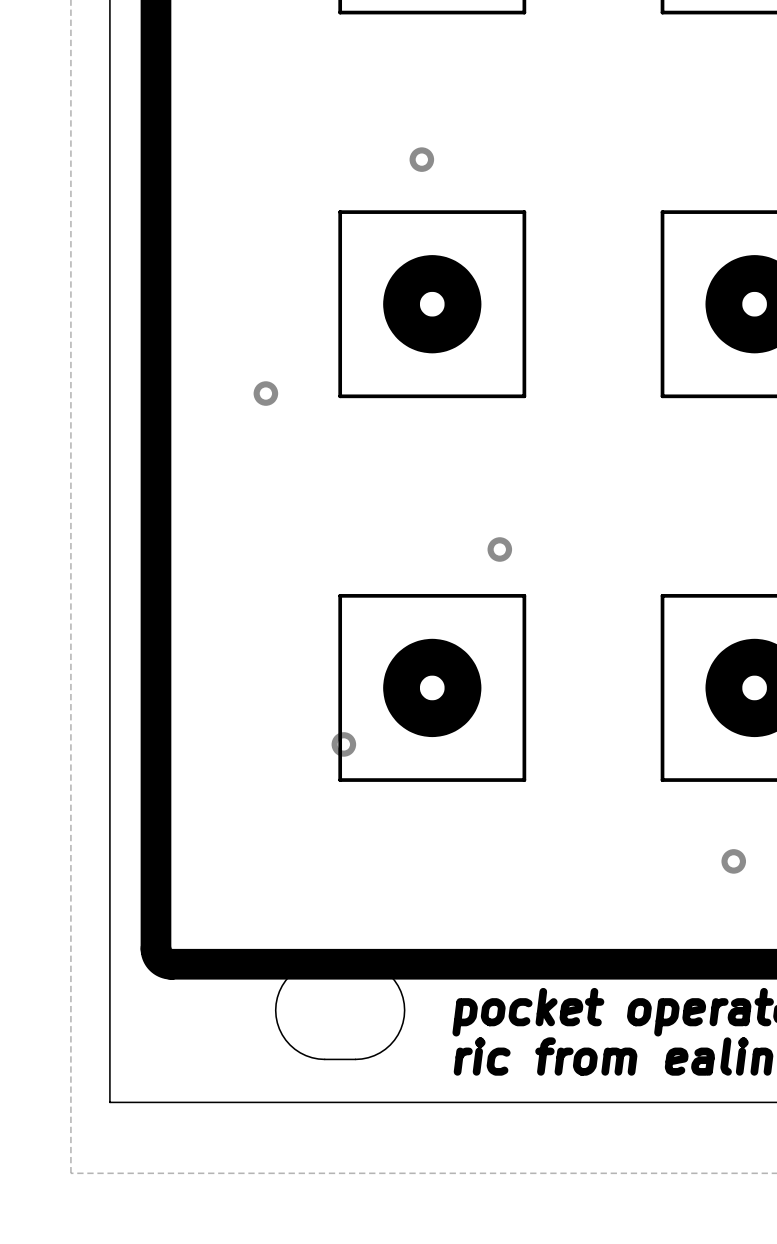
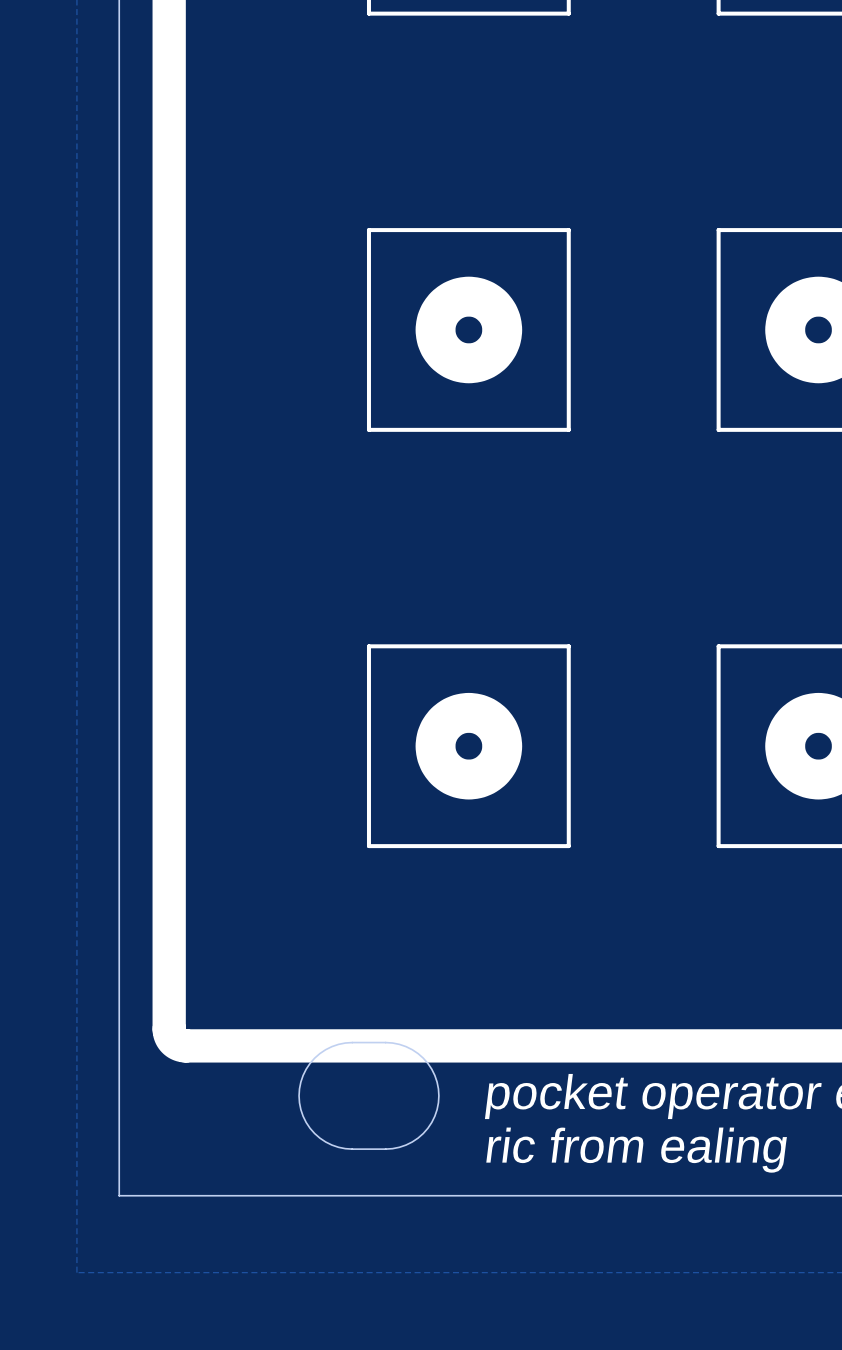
via: (421, 159) -> none
via: (265, 393) -> none
via: (499, 549) -> none
via: (343, 744) -> none
via: (733, 861) -> none

